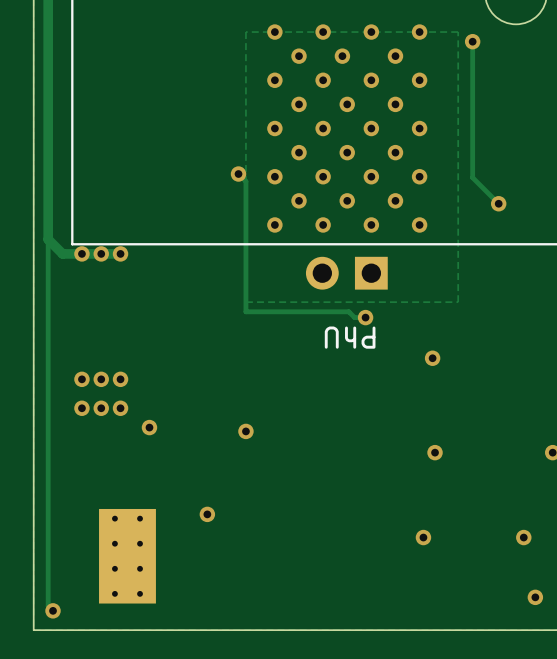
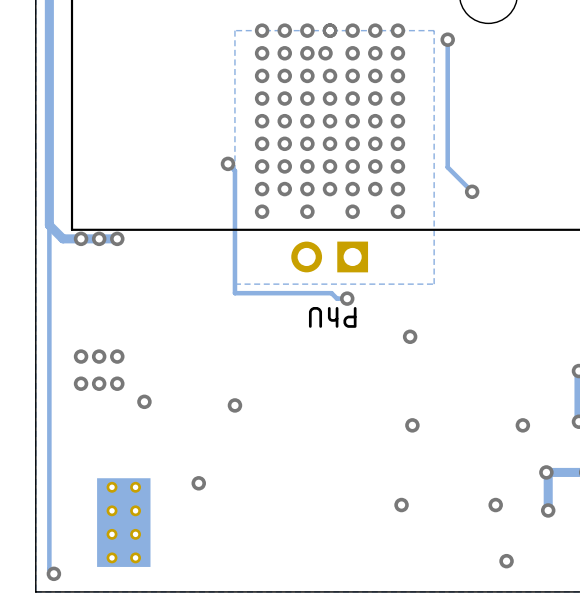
via: none -> (284, 30)
via: none -> (330, 30)
via: none -> (375, 30)
via: none -> (262, 53)
via: none -> (307, 53)
via: none -> (352, 53)
via: none -> (397, 53)
via: none -> (284, 75)
via: none -> (330, 75)
via: none -> (375, 75)
via: none -> (262, 98)
via: none -> (307, 98)
via: none -> (352, 98)
via: none -> (397, 98)
via: none -> (284, 121)
via: none -> (330, 121)
via: none -> (375, 121)
via: none -> (262, 143)
via: none -> (307, 143)
via: none -> (352, 143)
via: none -> (397, 143)
via: none -> (284, 166)
via: none -> (330, 166)
via: none -> (375, 166)
via: none -> (262, 189)
via: none -> (307, 189)
via: none -> (352, 189)
via: none -> (397, 189)

